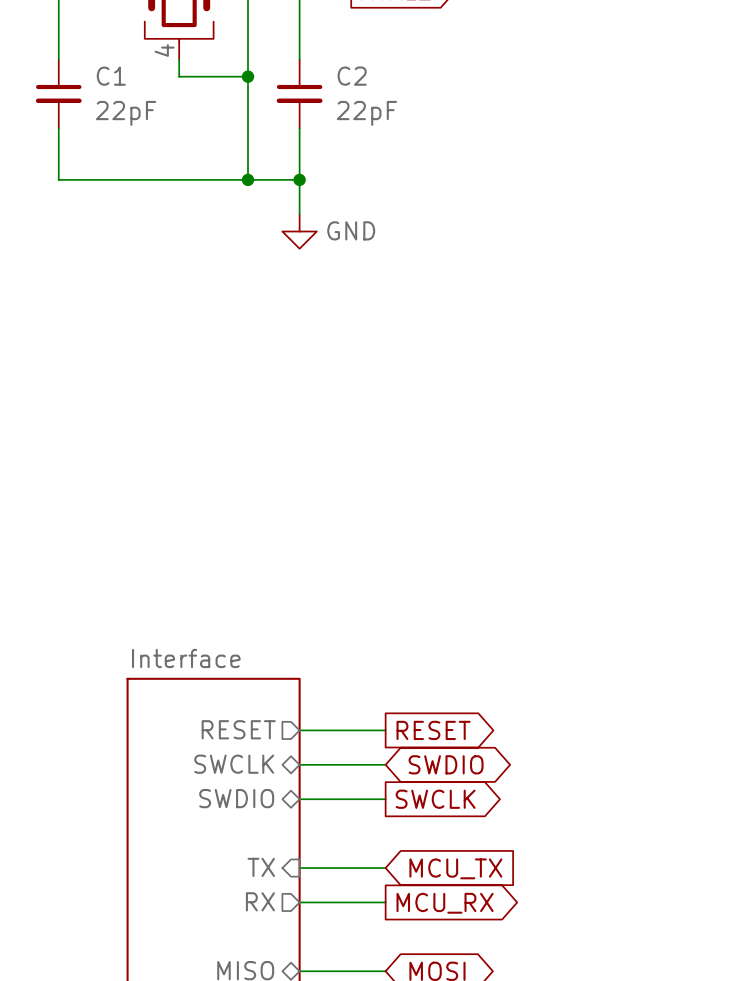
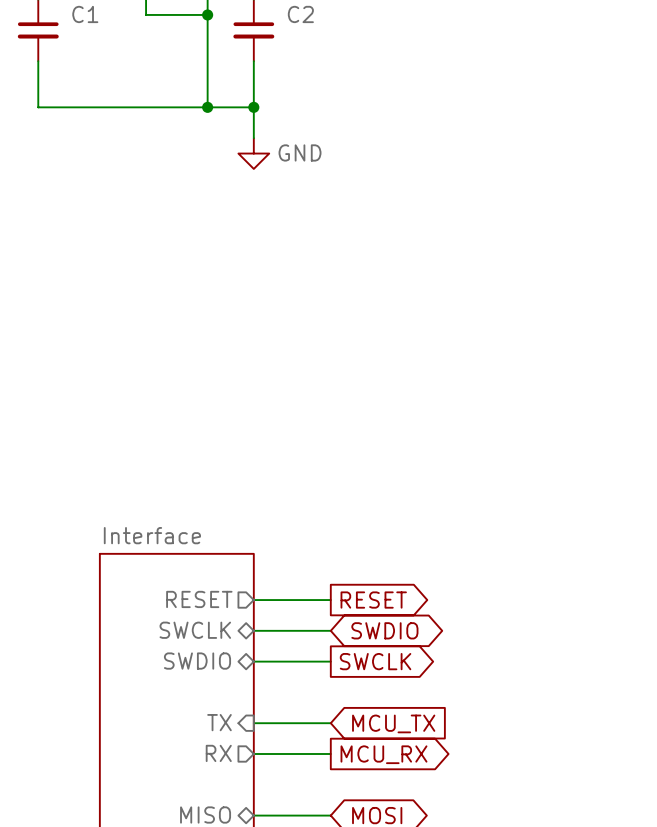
C1 value: 22pF (126, 113) -> none
C2 value: 22pF (366, 113) -> none

